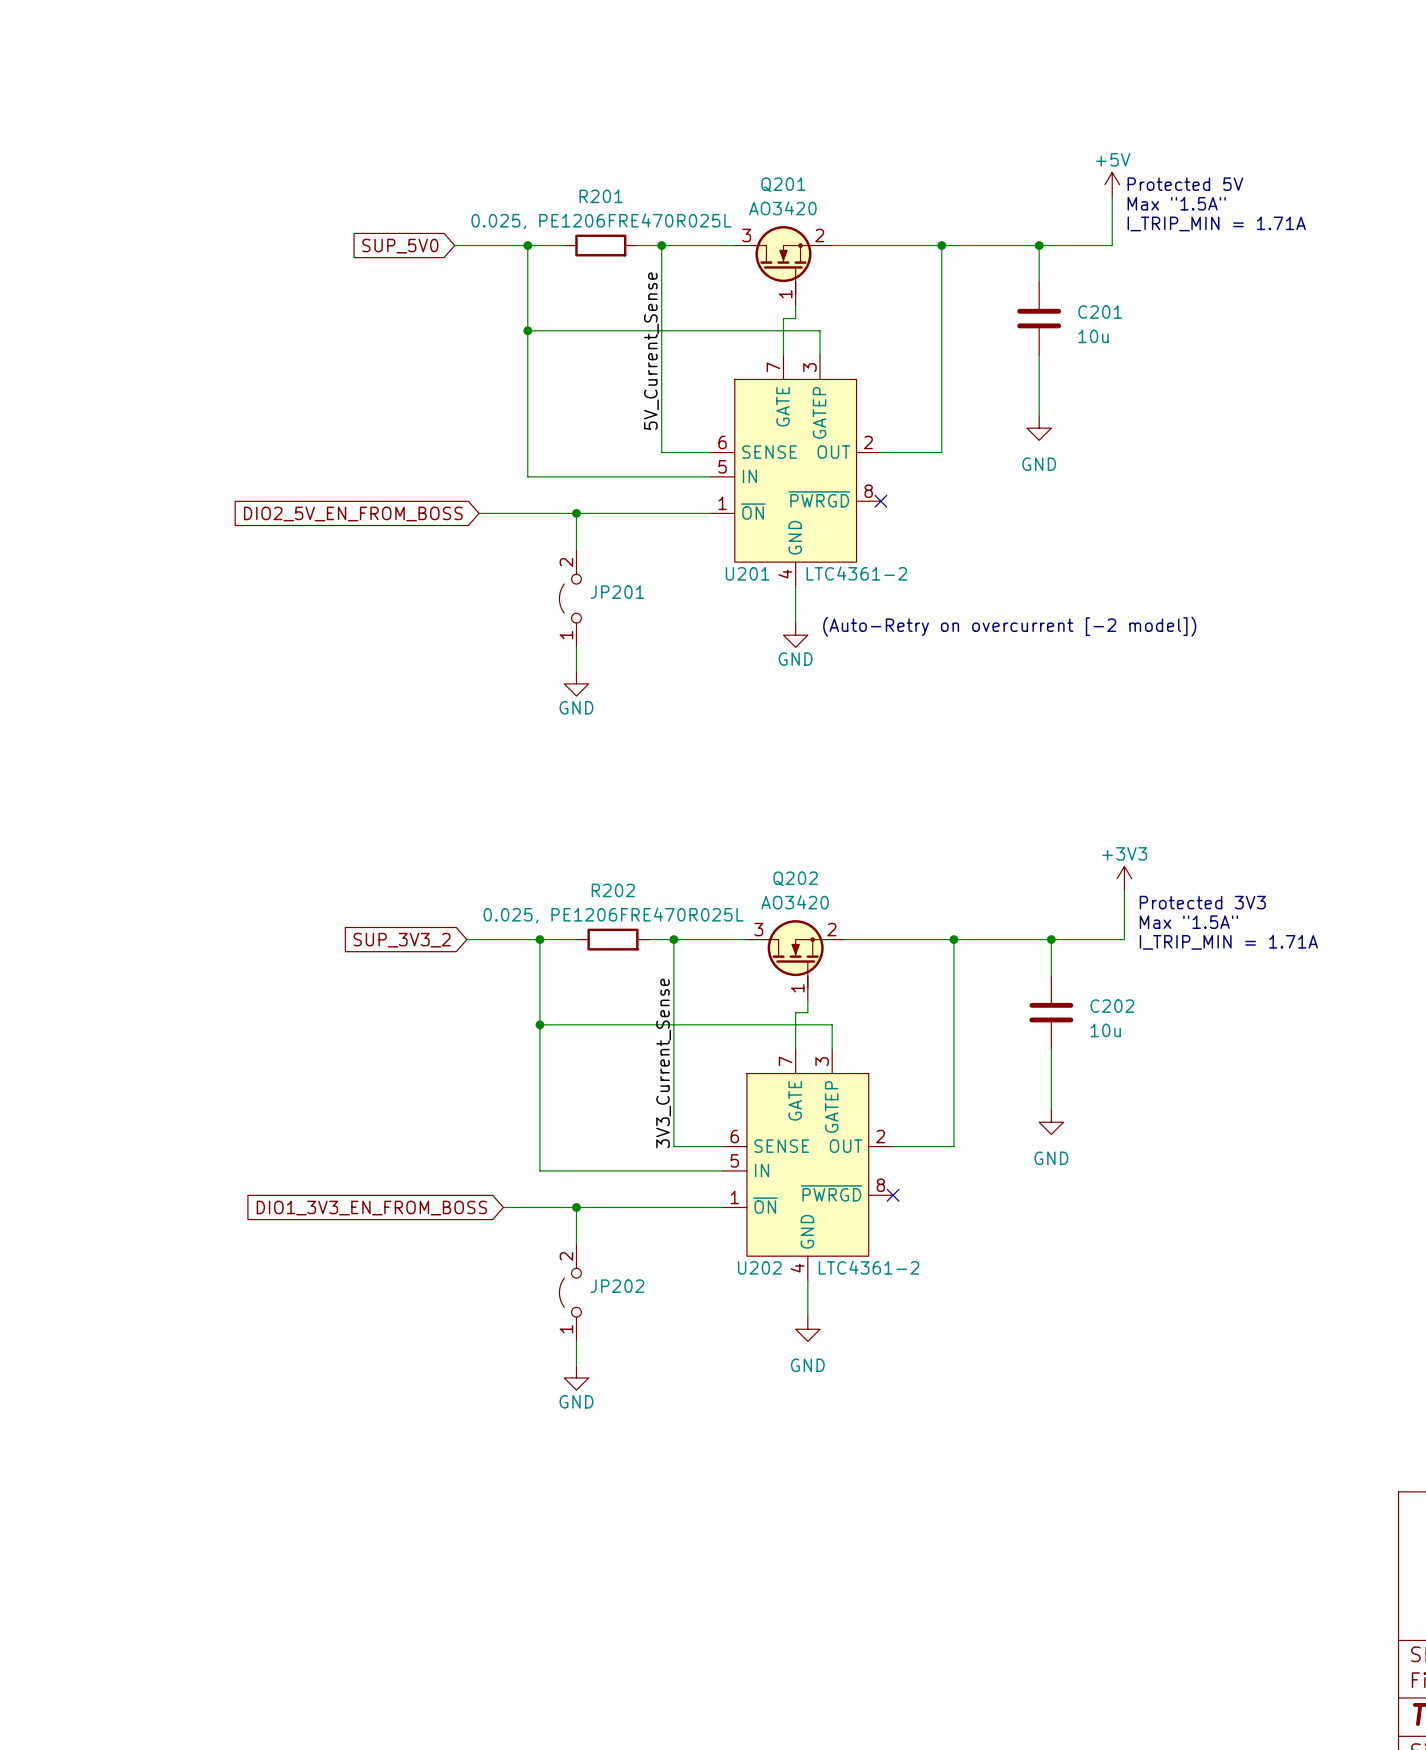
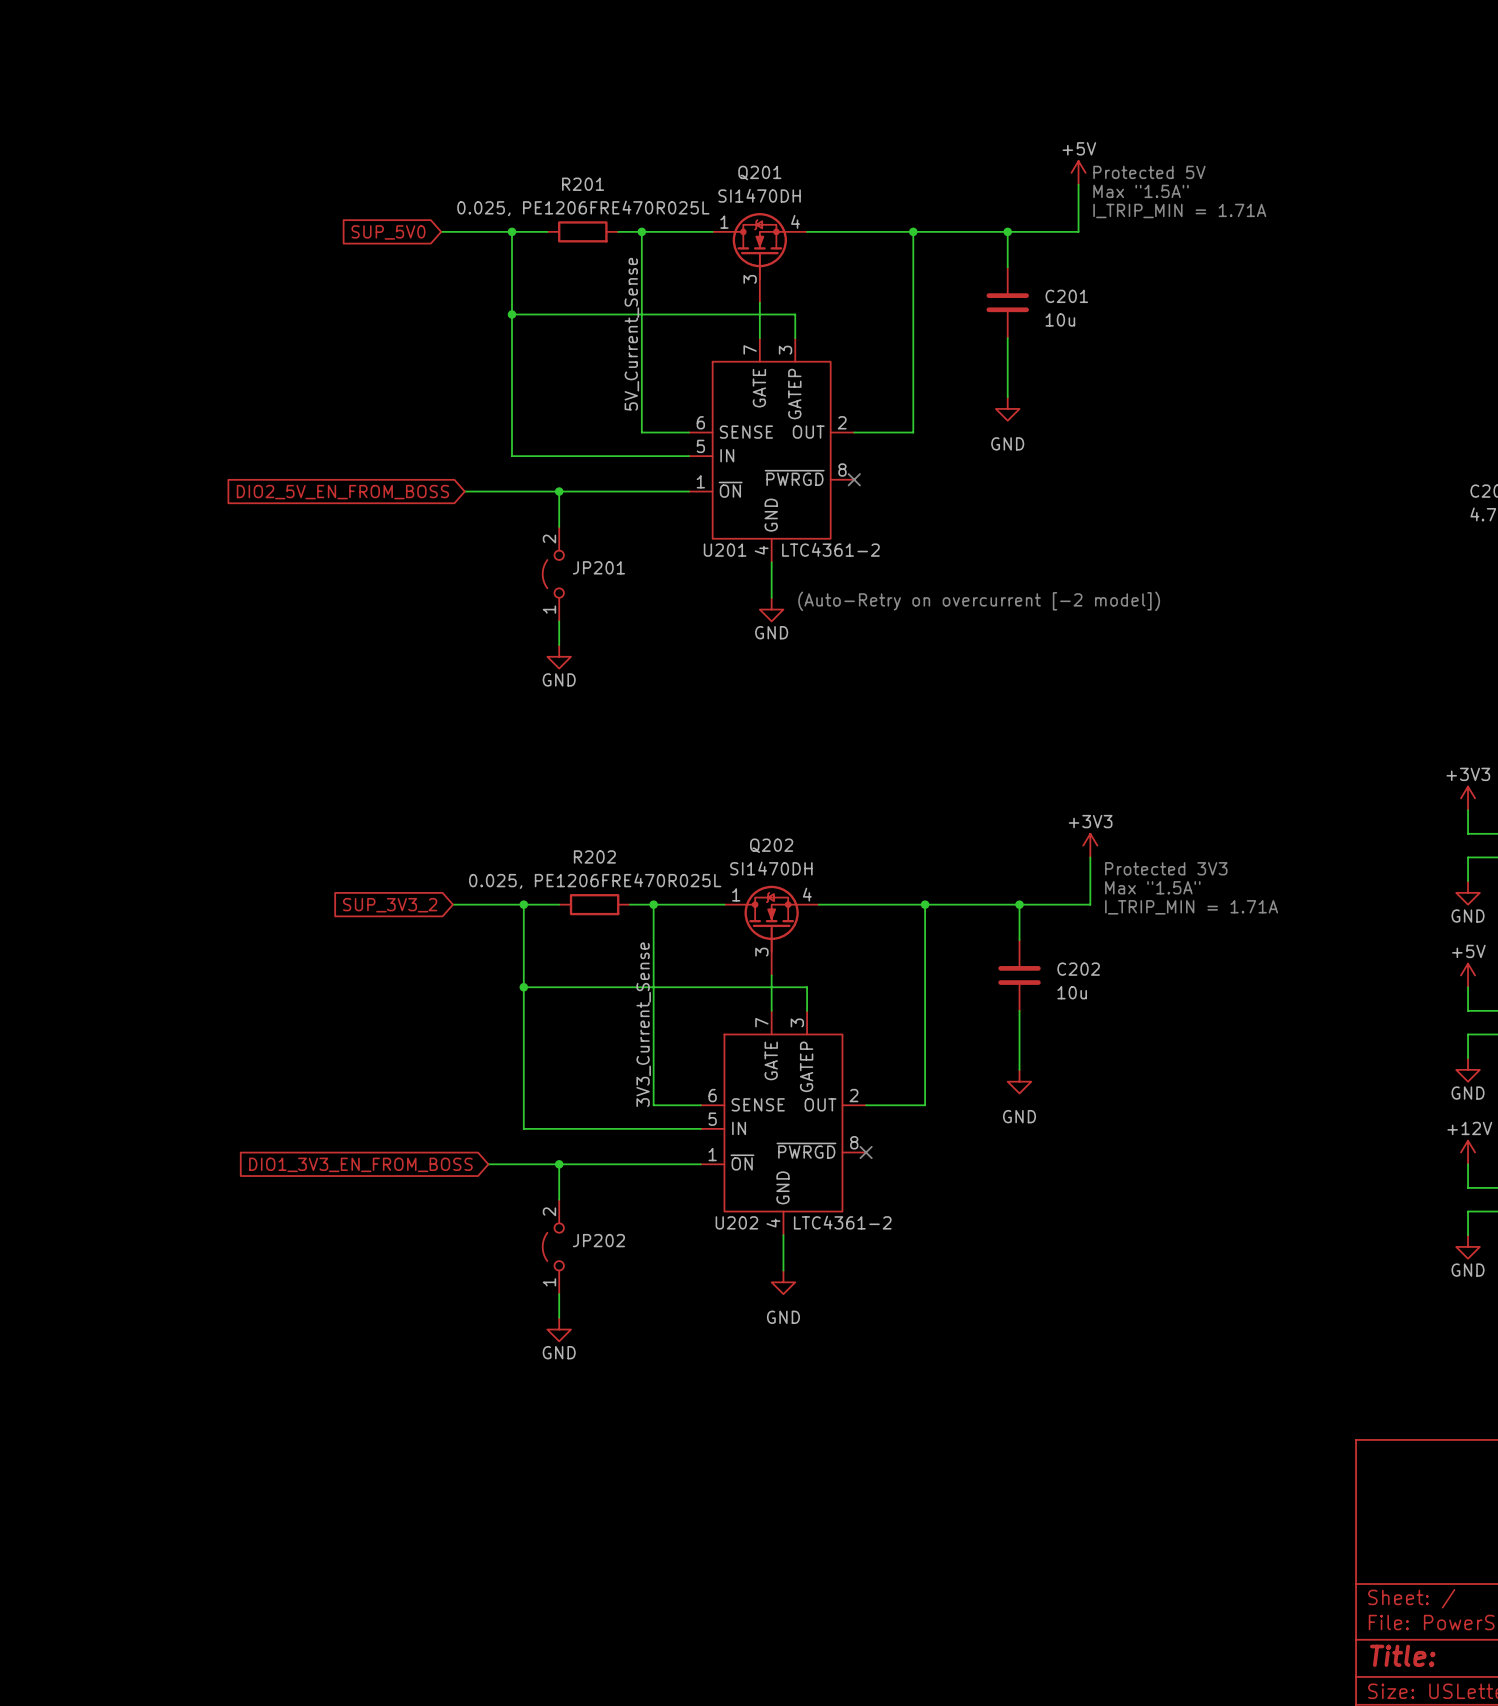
Q201 value: AO3420 (782, 208) -> SI1470DH (759, 195)
Q201 symbol: [734, 226, 833, 307] -> [712, 212, 808, 303]
wire: (795, 306) (795, 318) (783, 318) -> none
Q202 value: AO3420 (795, 902) -> SI1470DH (771, 868)
Q202 symbol: [746, 920, 845, 1001] -> [724, 885, 819, 976]
wire: (807, 1000) (807, 1012) (795, 1012) -> none

